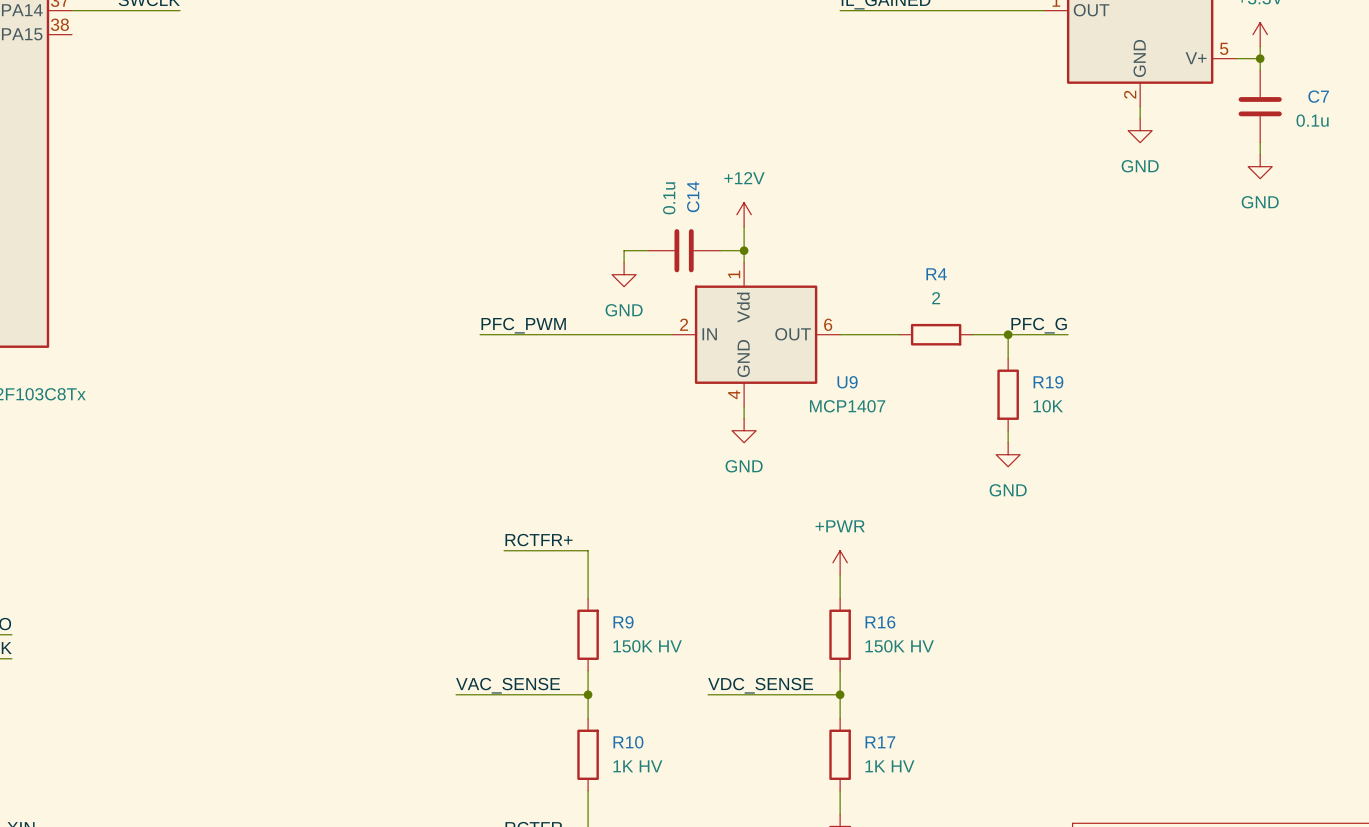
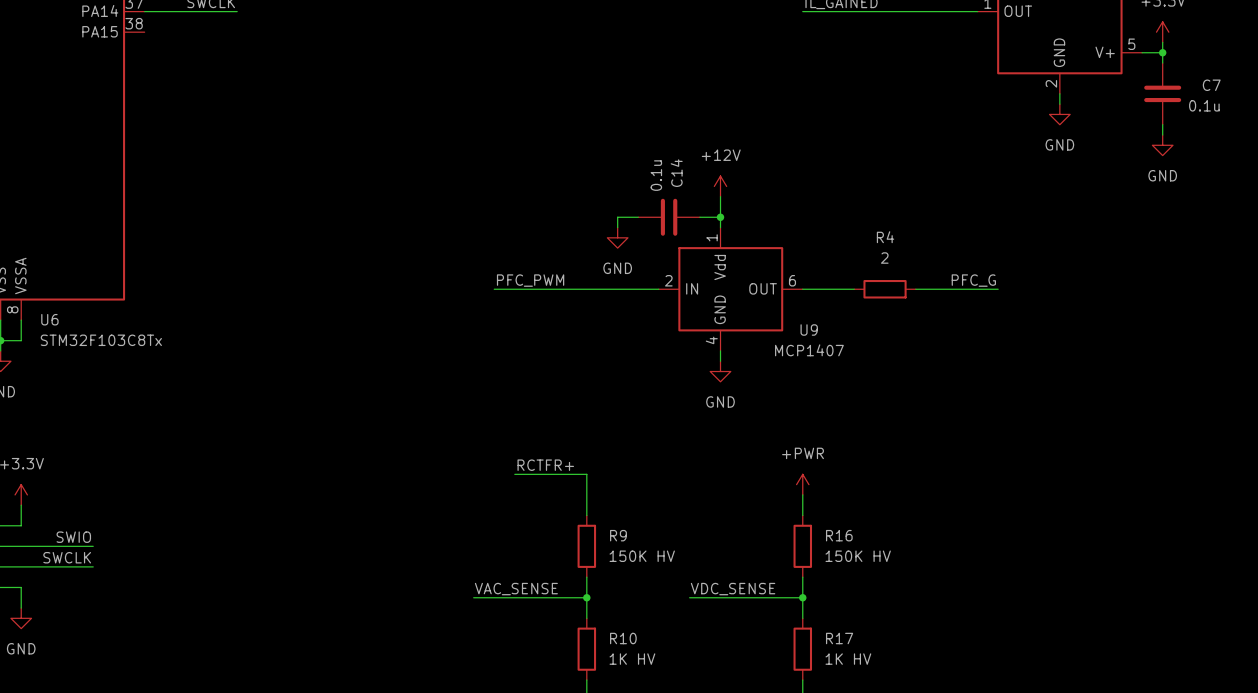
wire: (1008, 334) (1008, 358) -> none
junction: (1008, 334) -> none
R19: 10K (1008, 394) -> none
wire: (1008, 430) (1008, 442) -> none
power symbol: GND (1008, 454) -> none

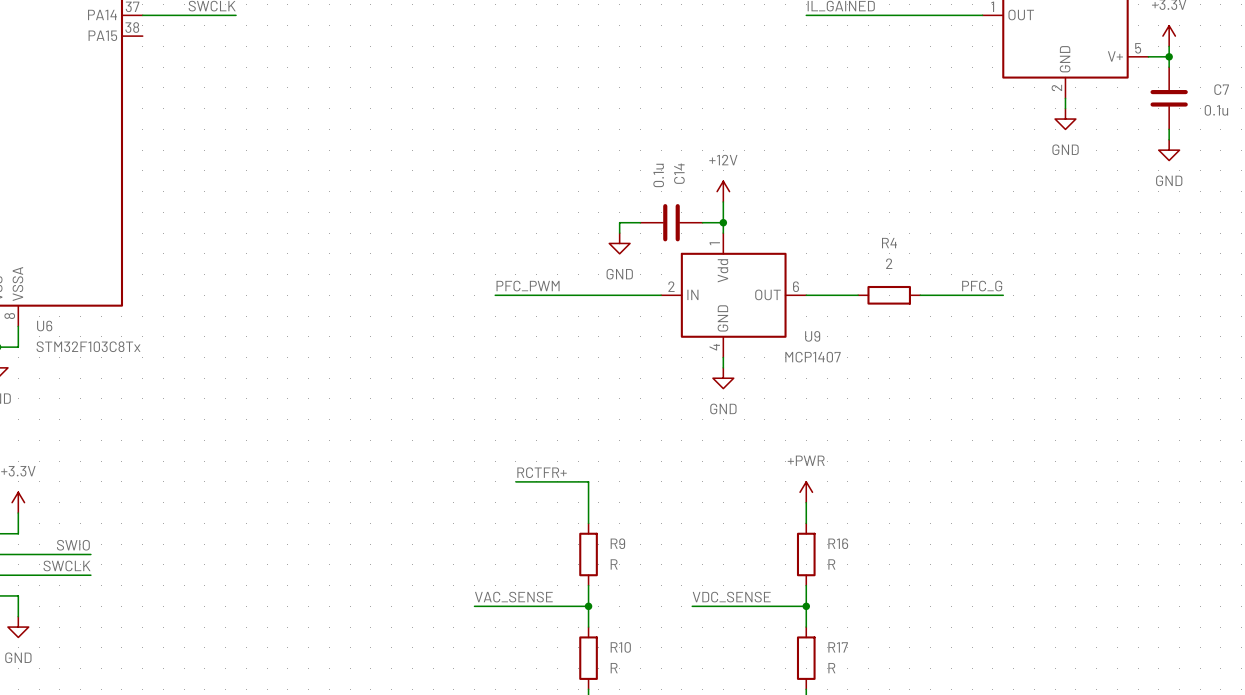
R9 value: 150K HV (642, 556) -> R (614, 564)
R16 value: 150K HV (858, 556) -> R (831, 564)
R10 value: 1K HV (632, 659) -> R (614, 668)
R17 value: 1K HV (848, 659) -> R (831, 668)

